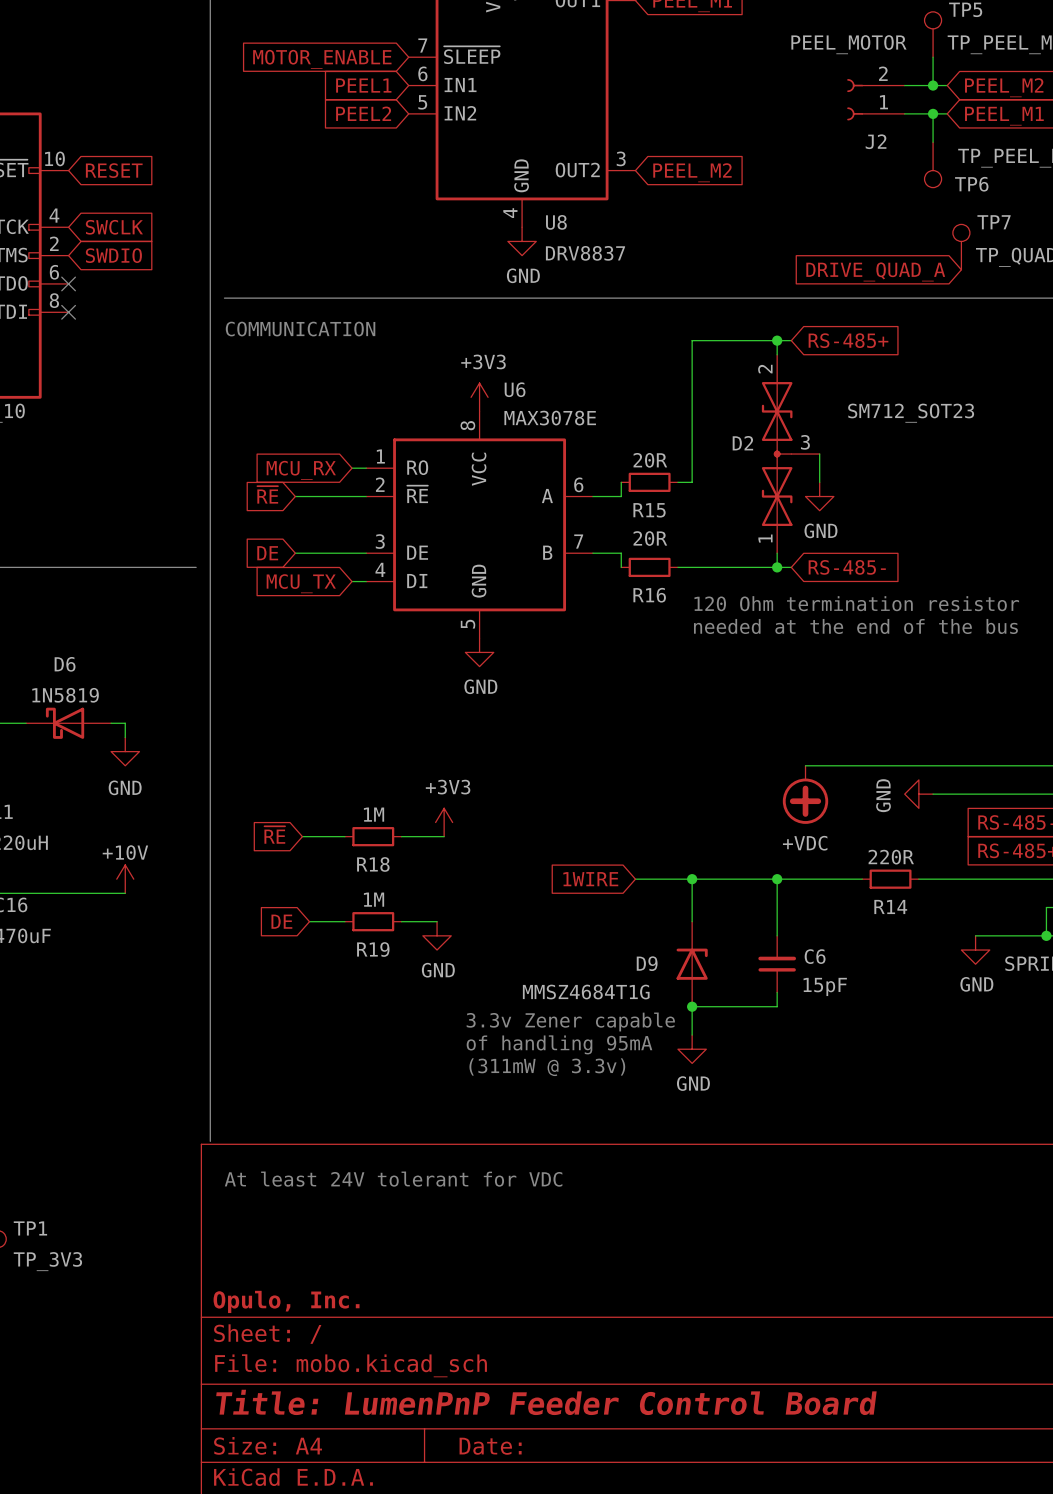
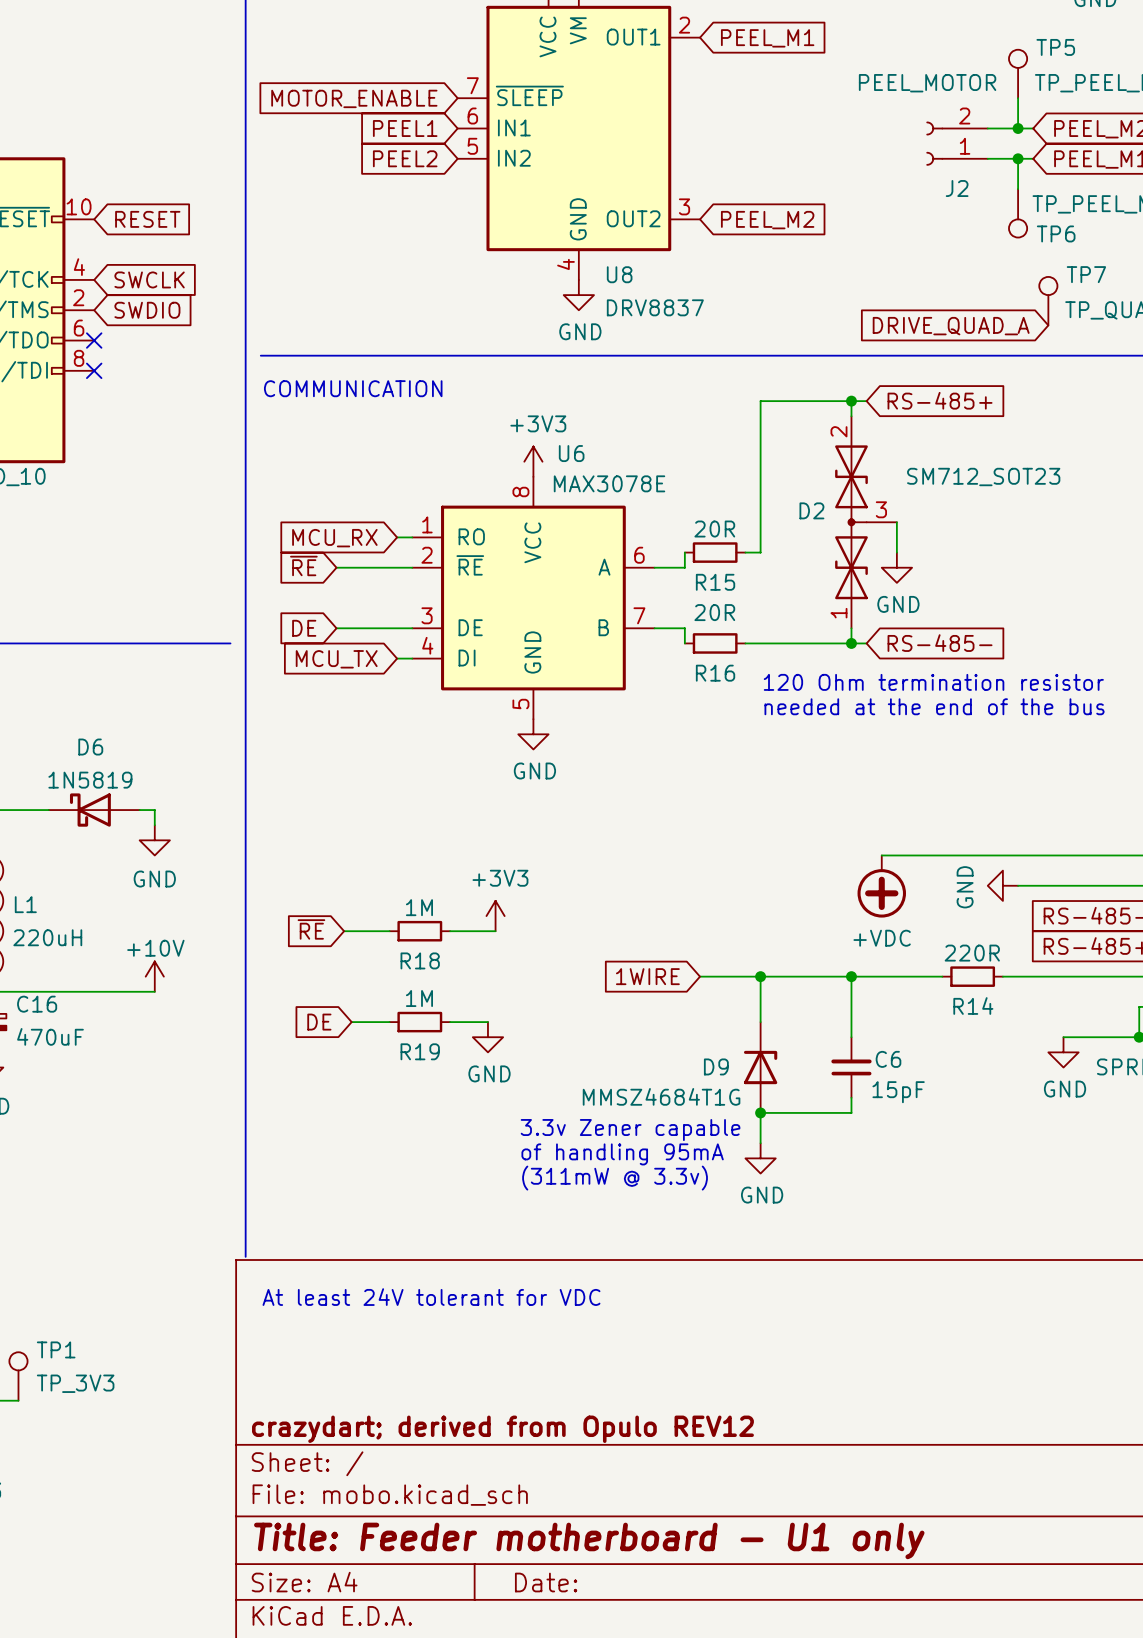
title block: Opulo, Inc. (286, 1301) -> crazydart; derived from Opulo REV12 (502, 1429)
title block: Title: LumenPnP Feeder Control Board (546, 1402) -> Title: Feeder motherboard - U1 only (589, 1540)

